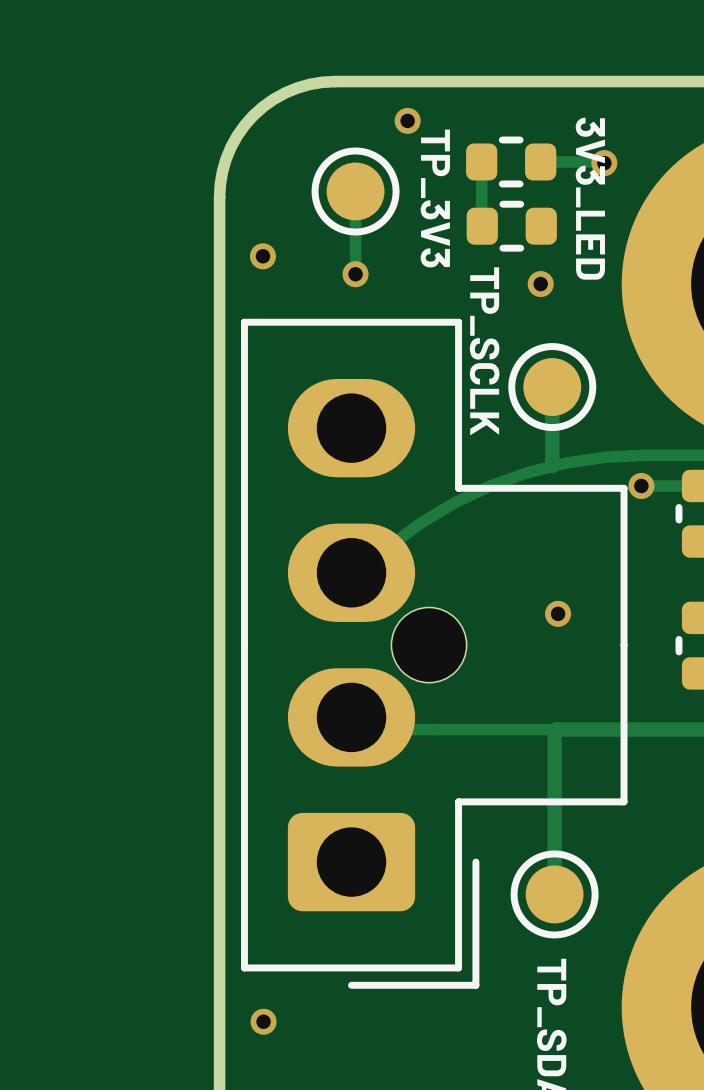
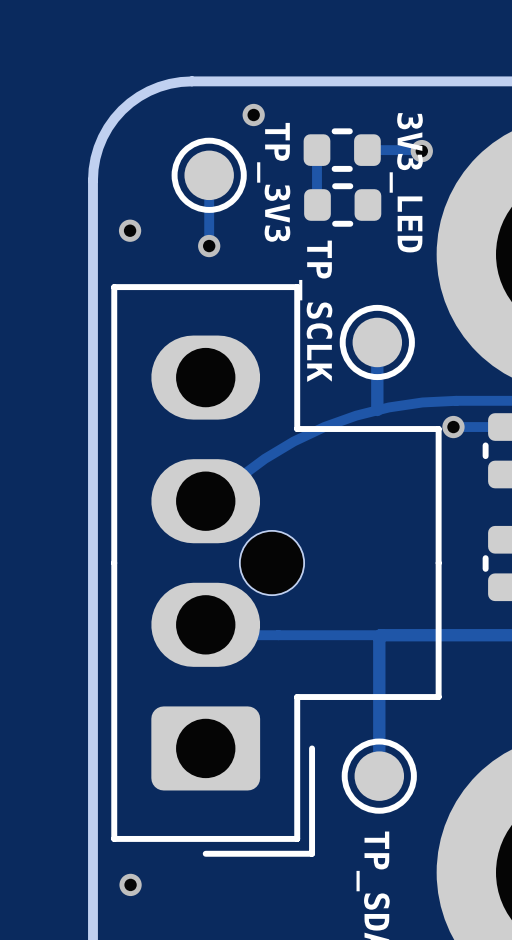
via: (540, 284) -> none
via: (558, 613) -> none

